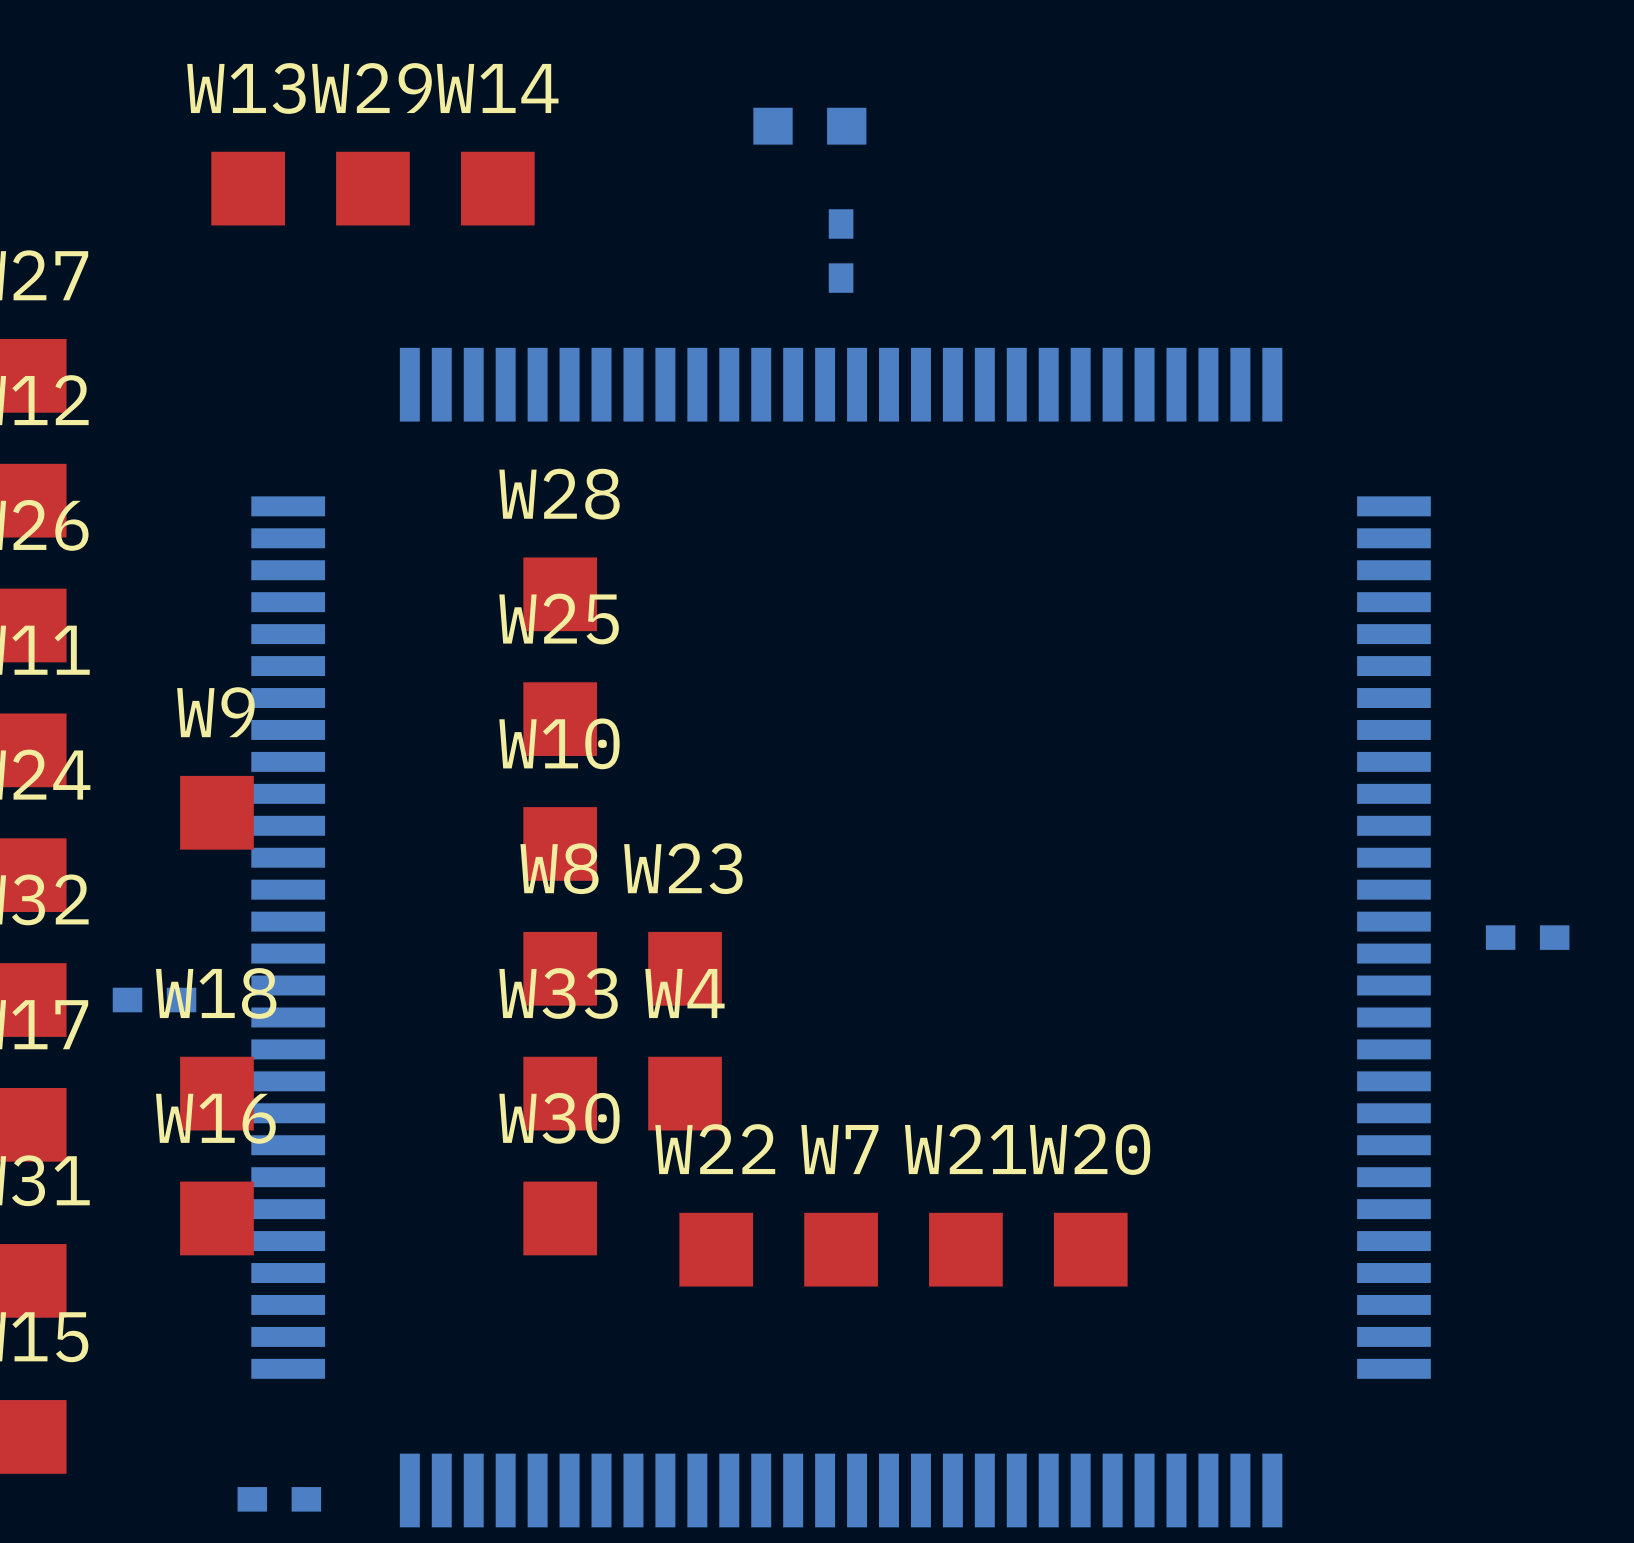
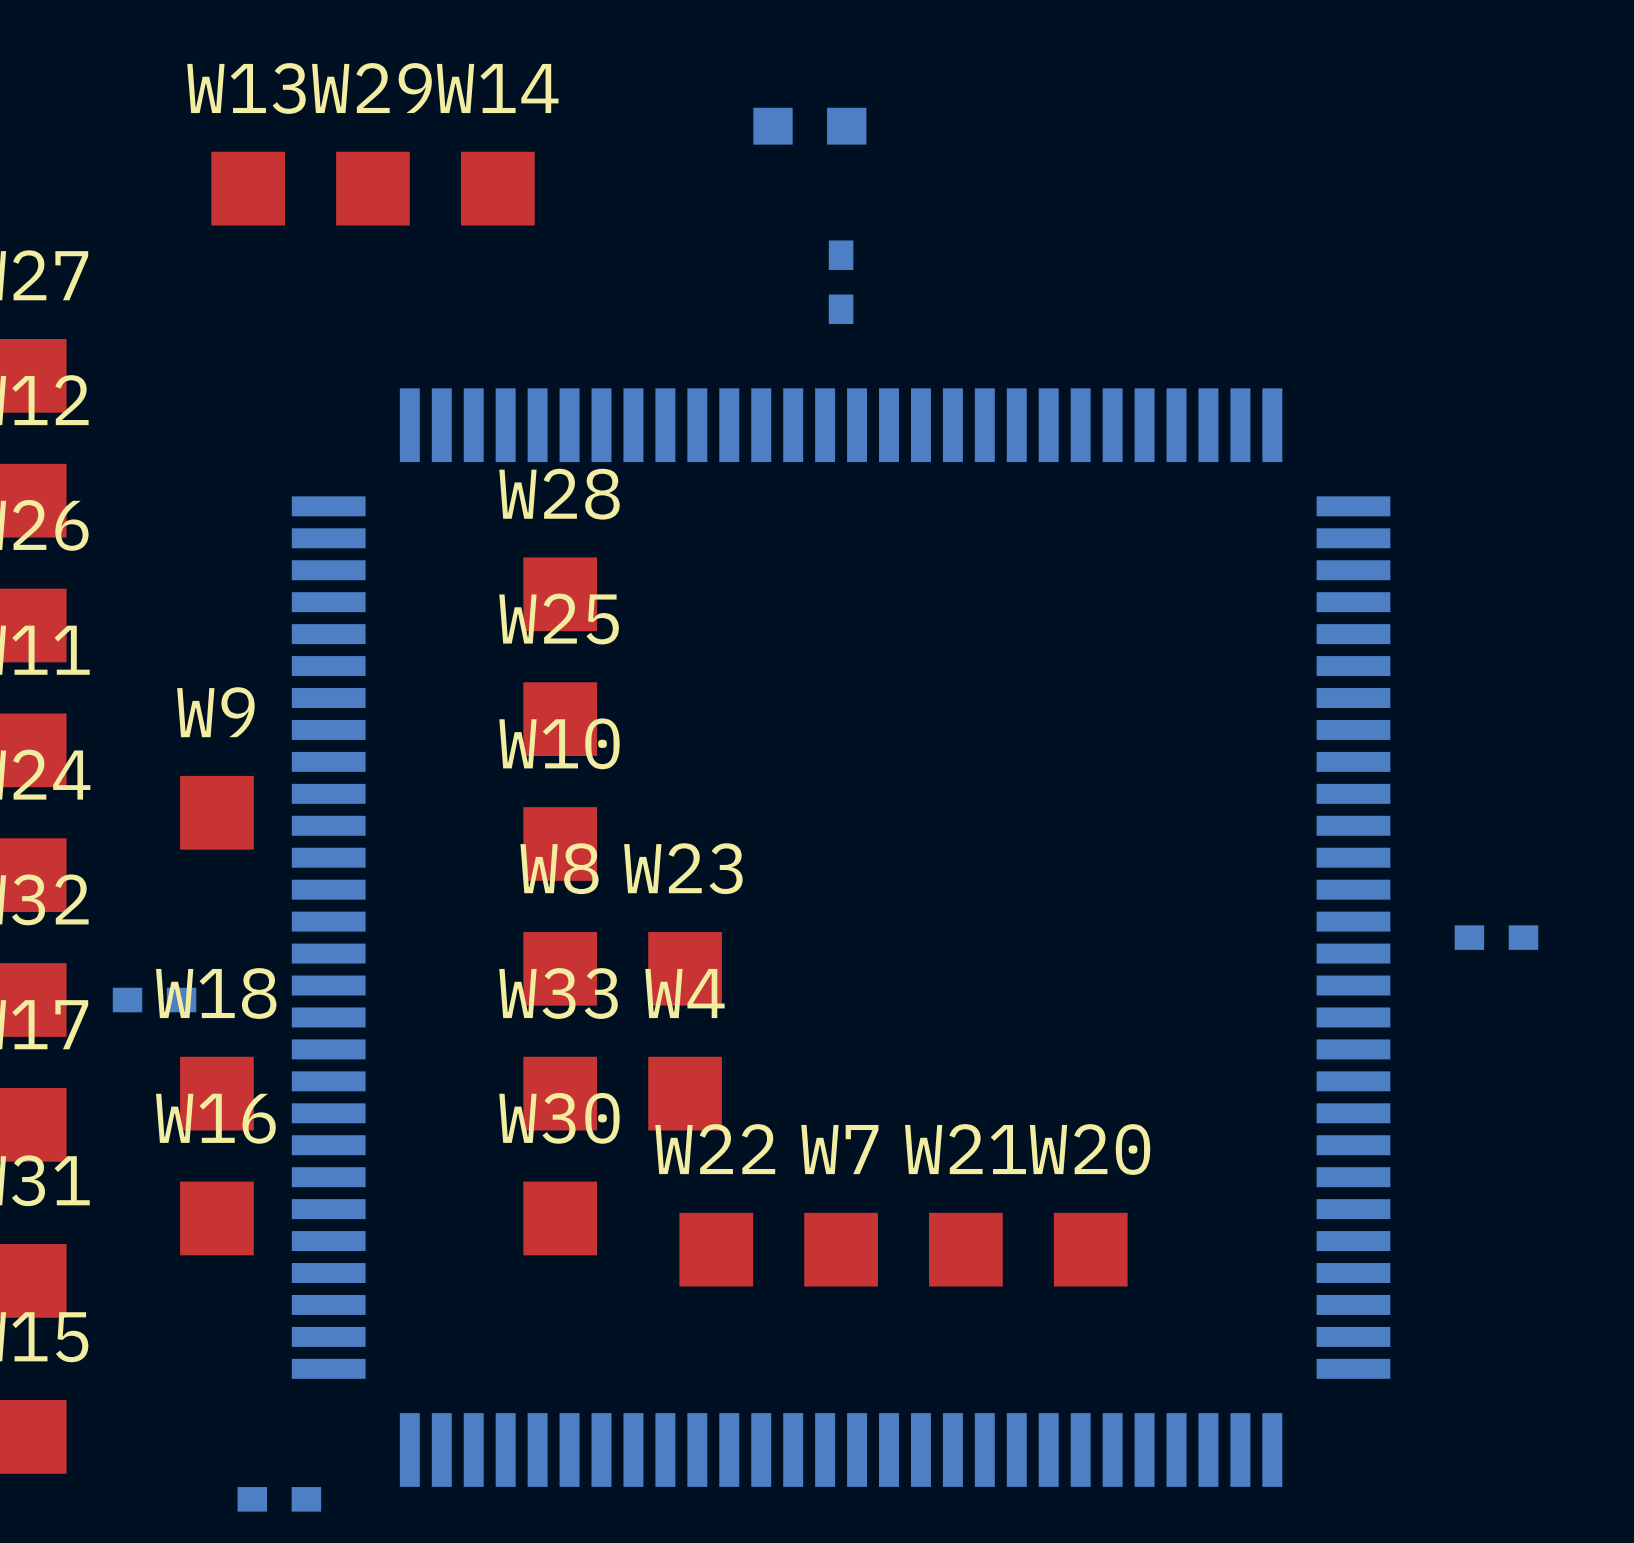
part position: (841, 251) -> (841, 282)
part footprint: [251, 347, 1431, 1528] -> [291, 388, 1391, 1487]
part position: (1527, 937) -> (1496, 937)

